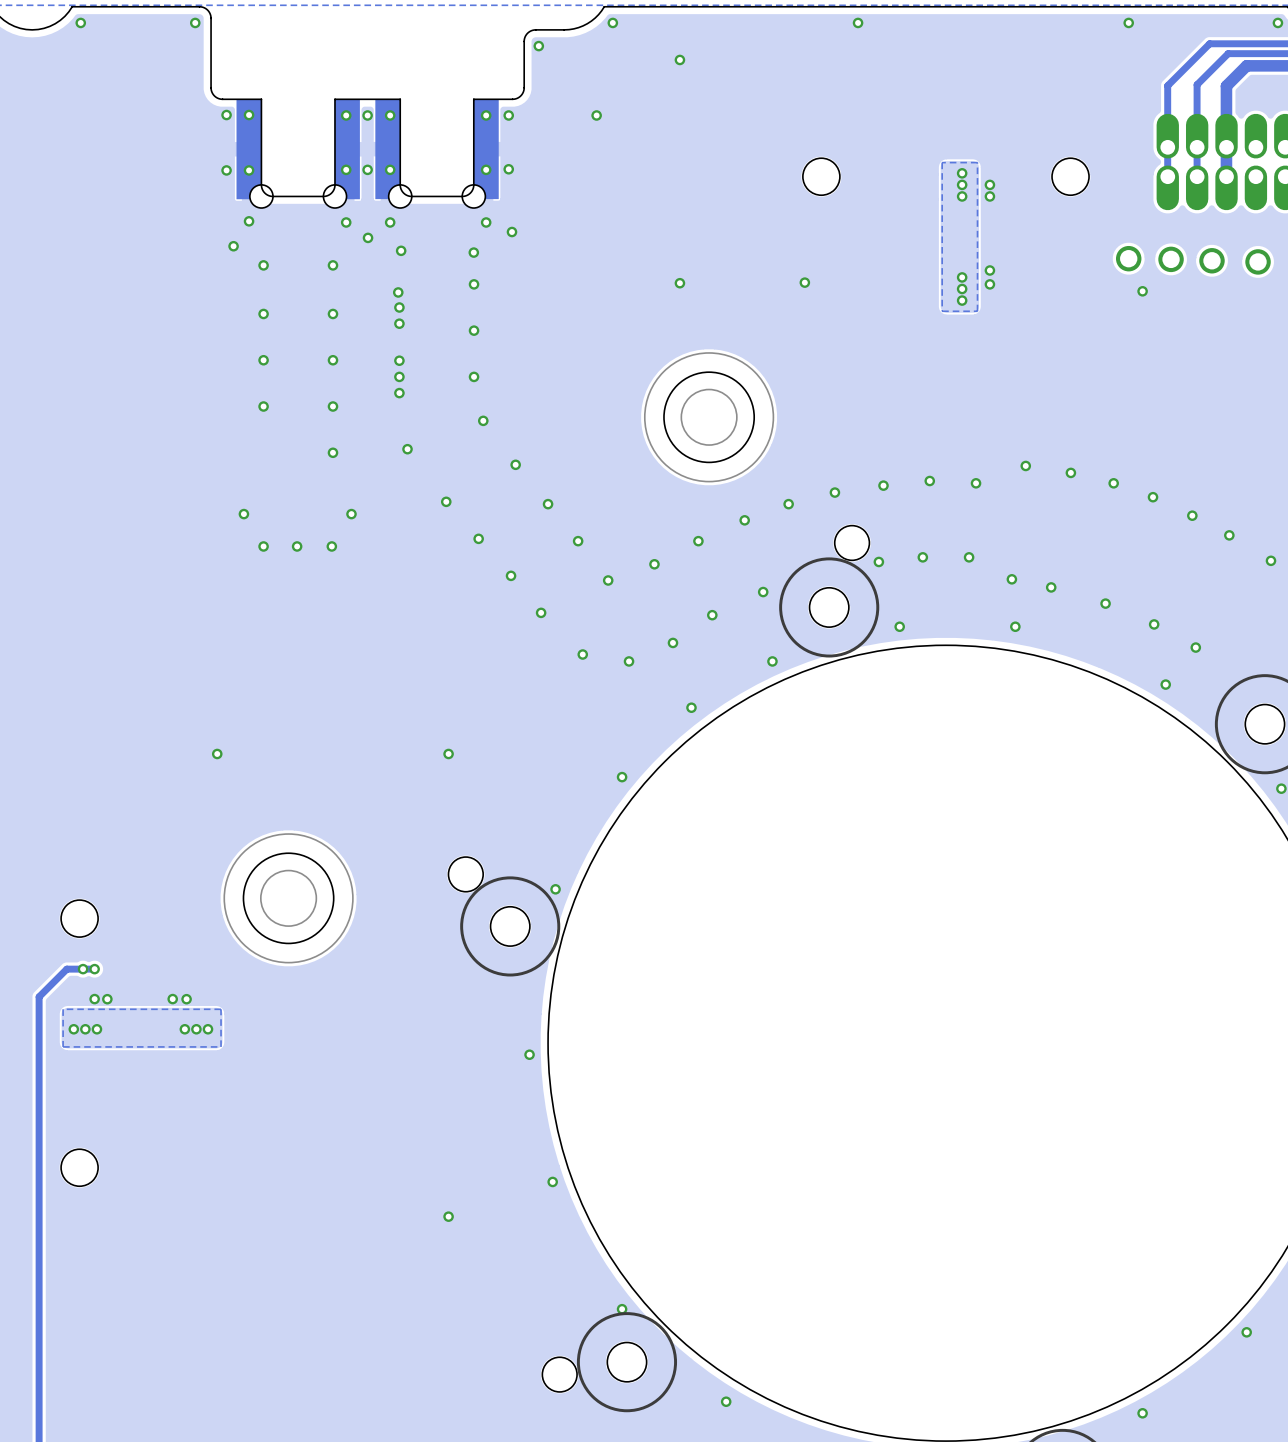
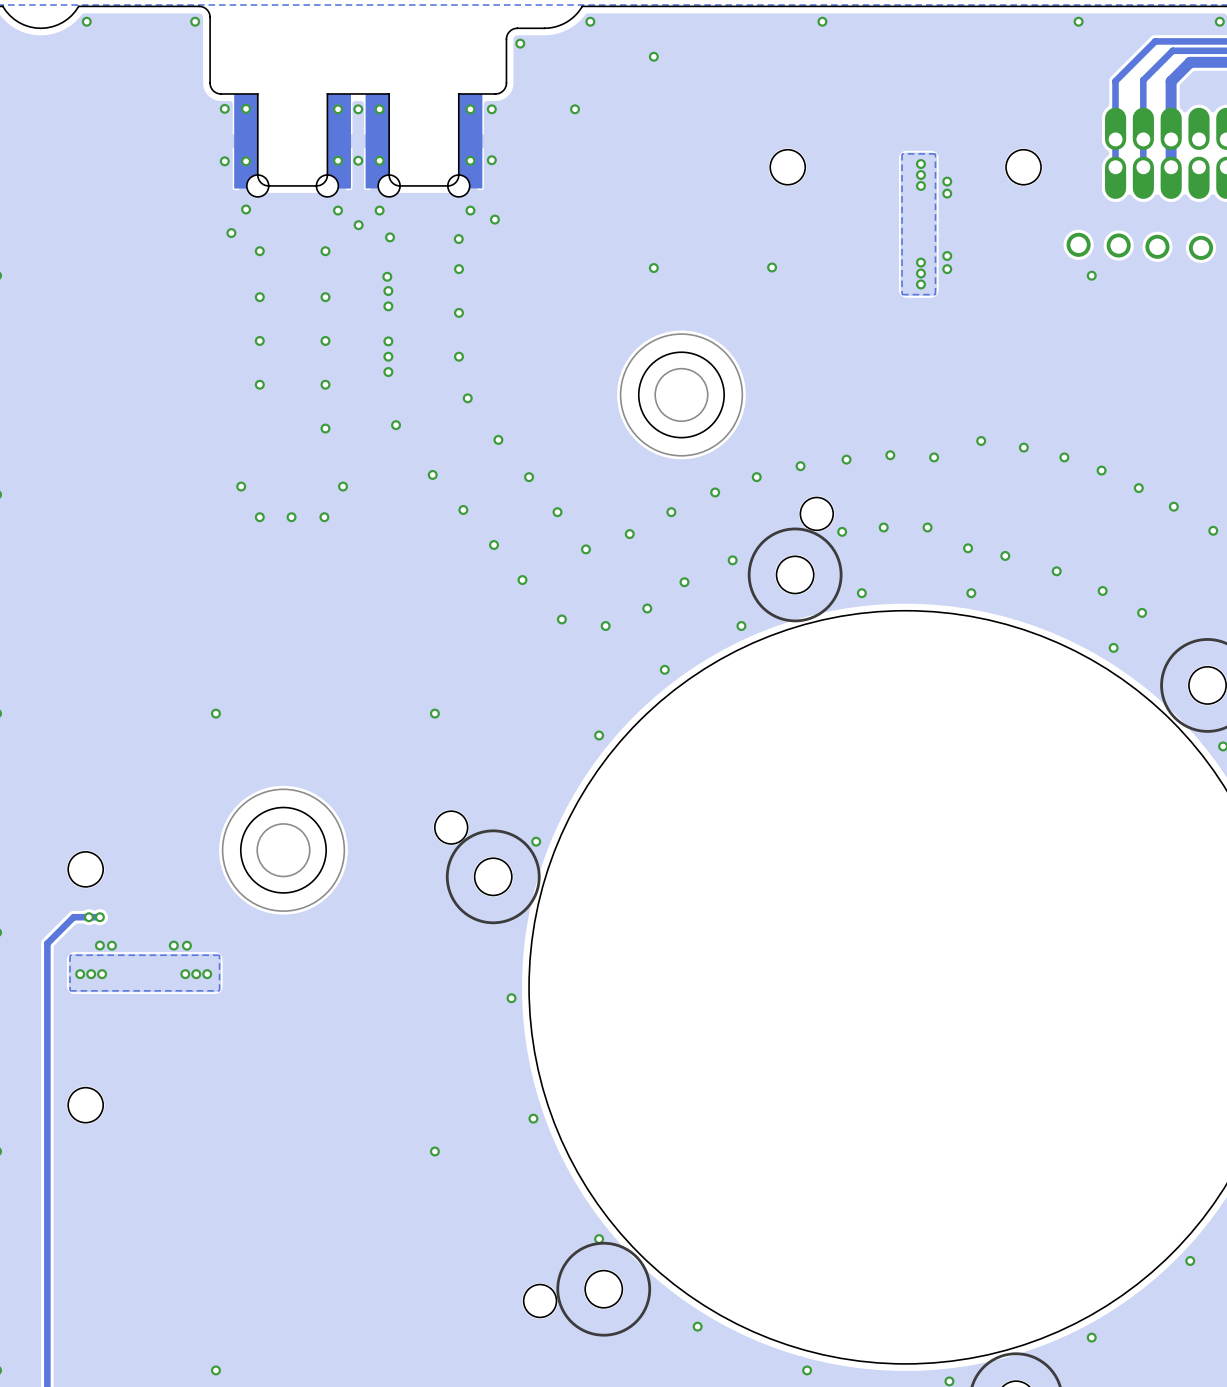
via: (989, 184) -> none
via: none -> (947, 181)
via: (989, 196) -> none
via: none -> (947, 193)

